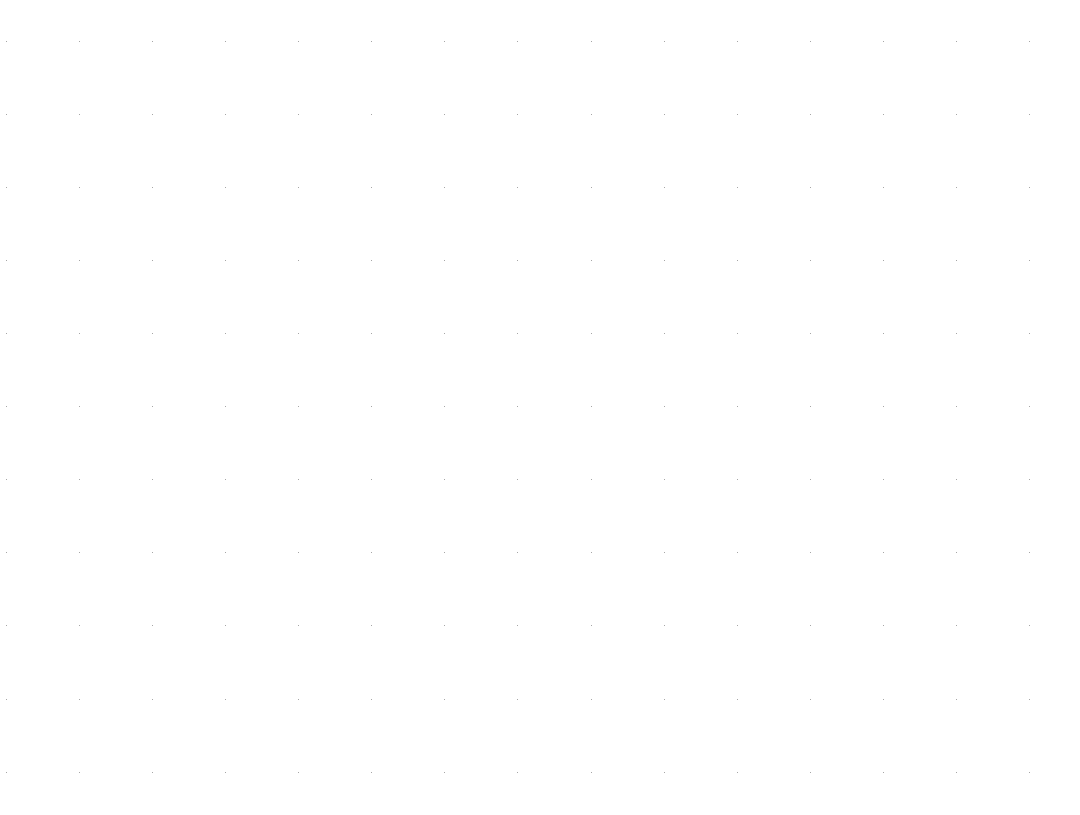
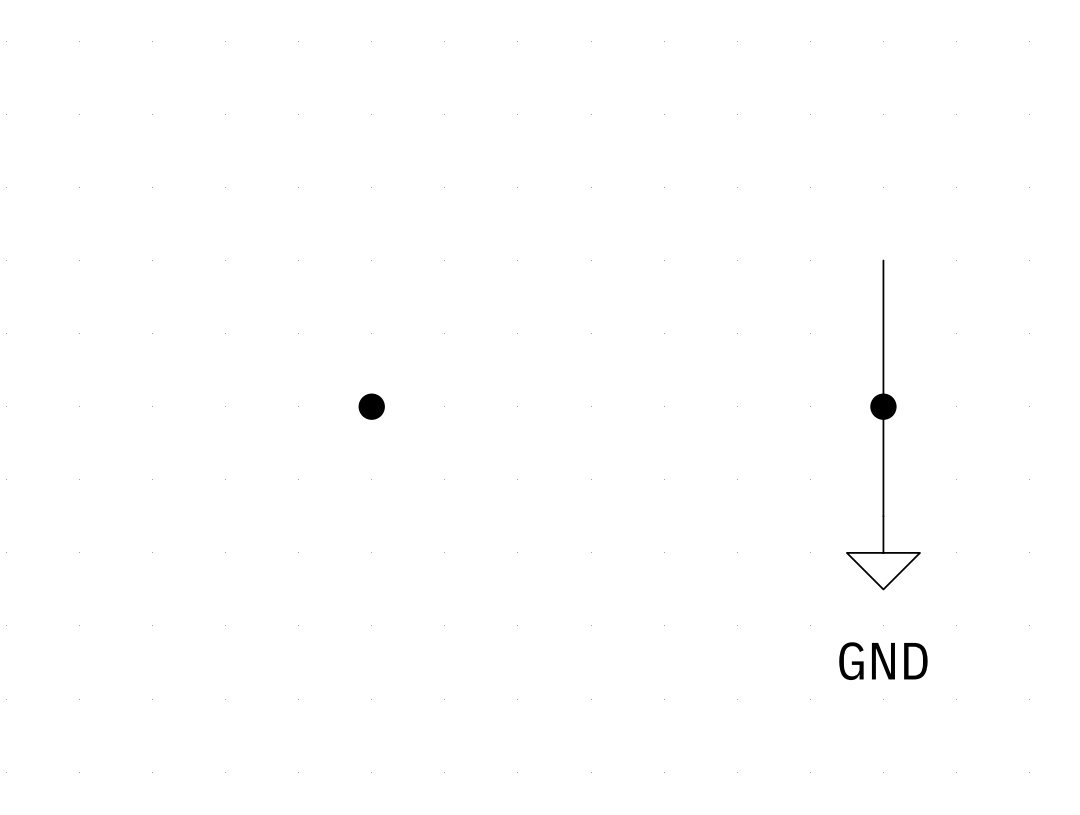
wire: none -> (883, 260) (883, 516)
junction: none -> (371, 406)
junction: none -> (883, 406)
power symbol: none -> GND (883, 552)

